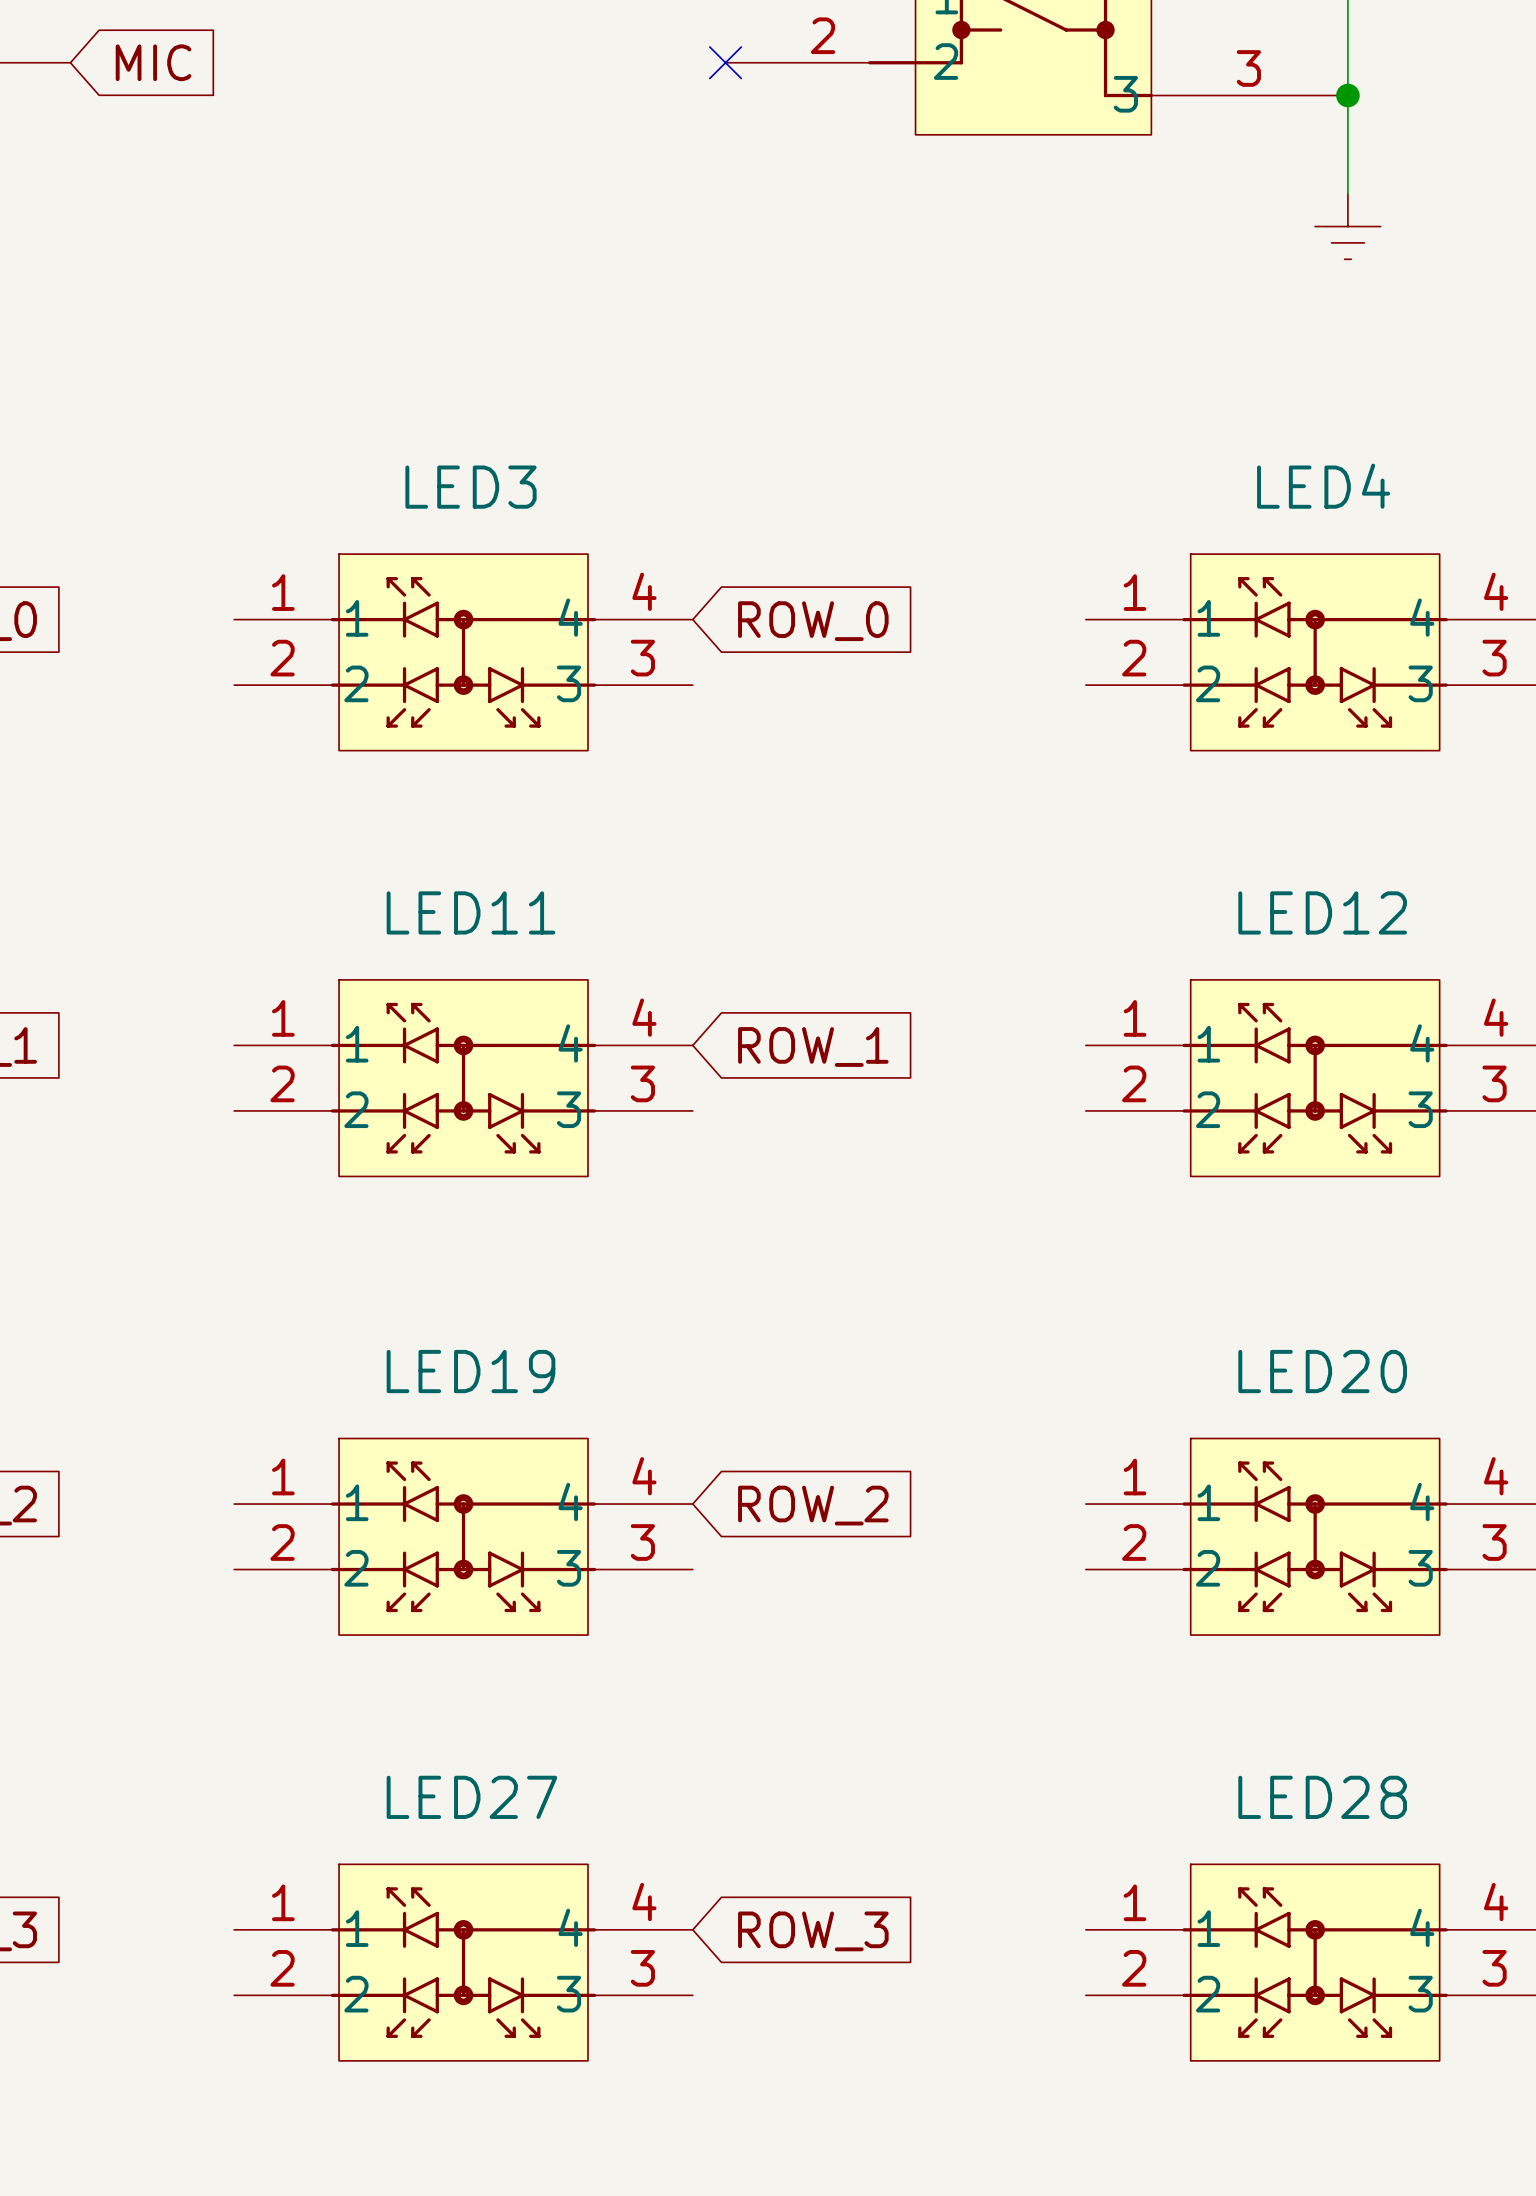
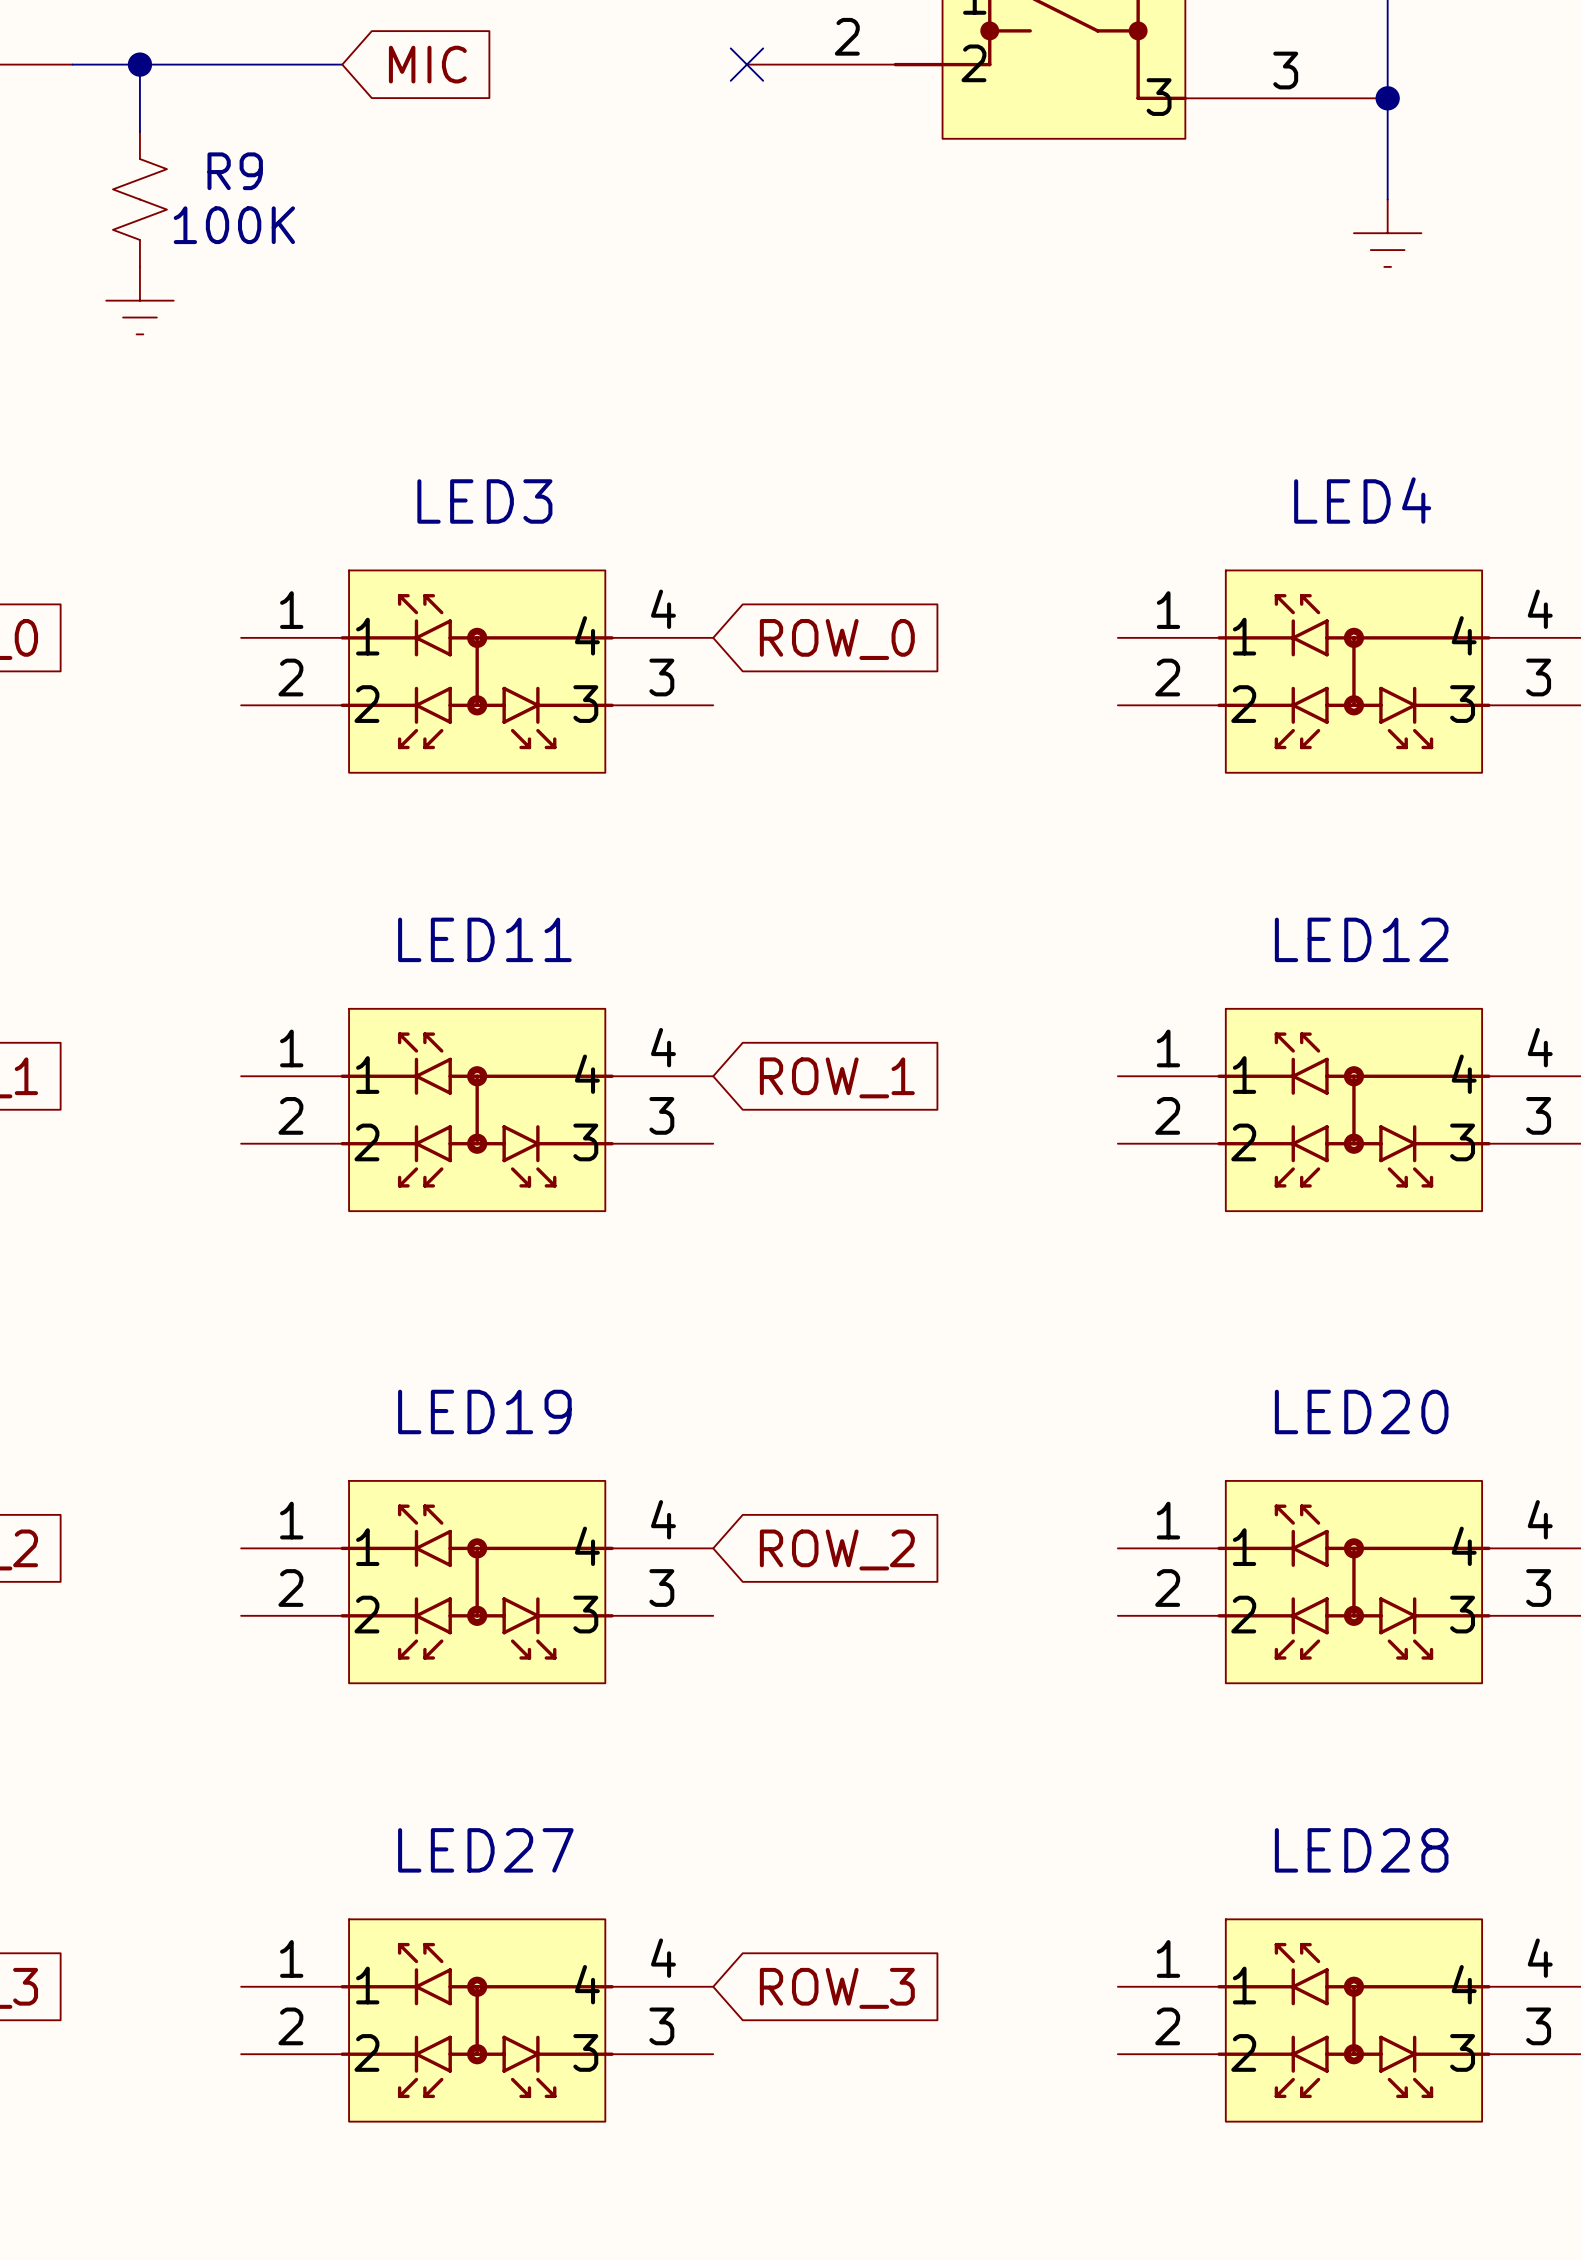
wire: none -> (72, 64) (342, 64)
wire: none -> (139, 64) (139, 132)
junction: none -> (139, 64)
global label position: MIC (153, 62) -> MIC (427, 64)
R9: none -> 100K (139, 199)
power symbol: none -> (139, 300)

